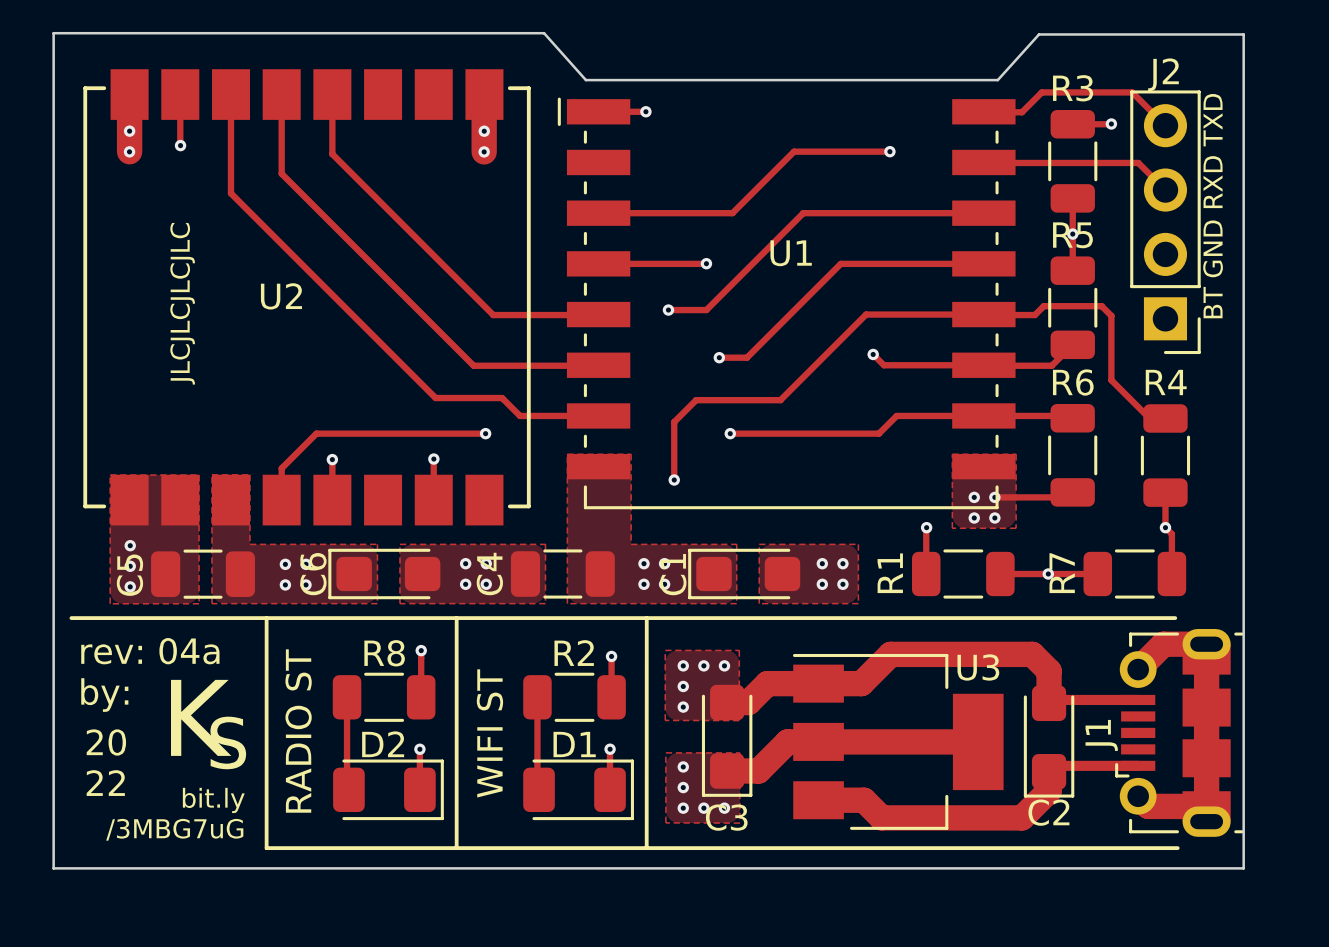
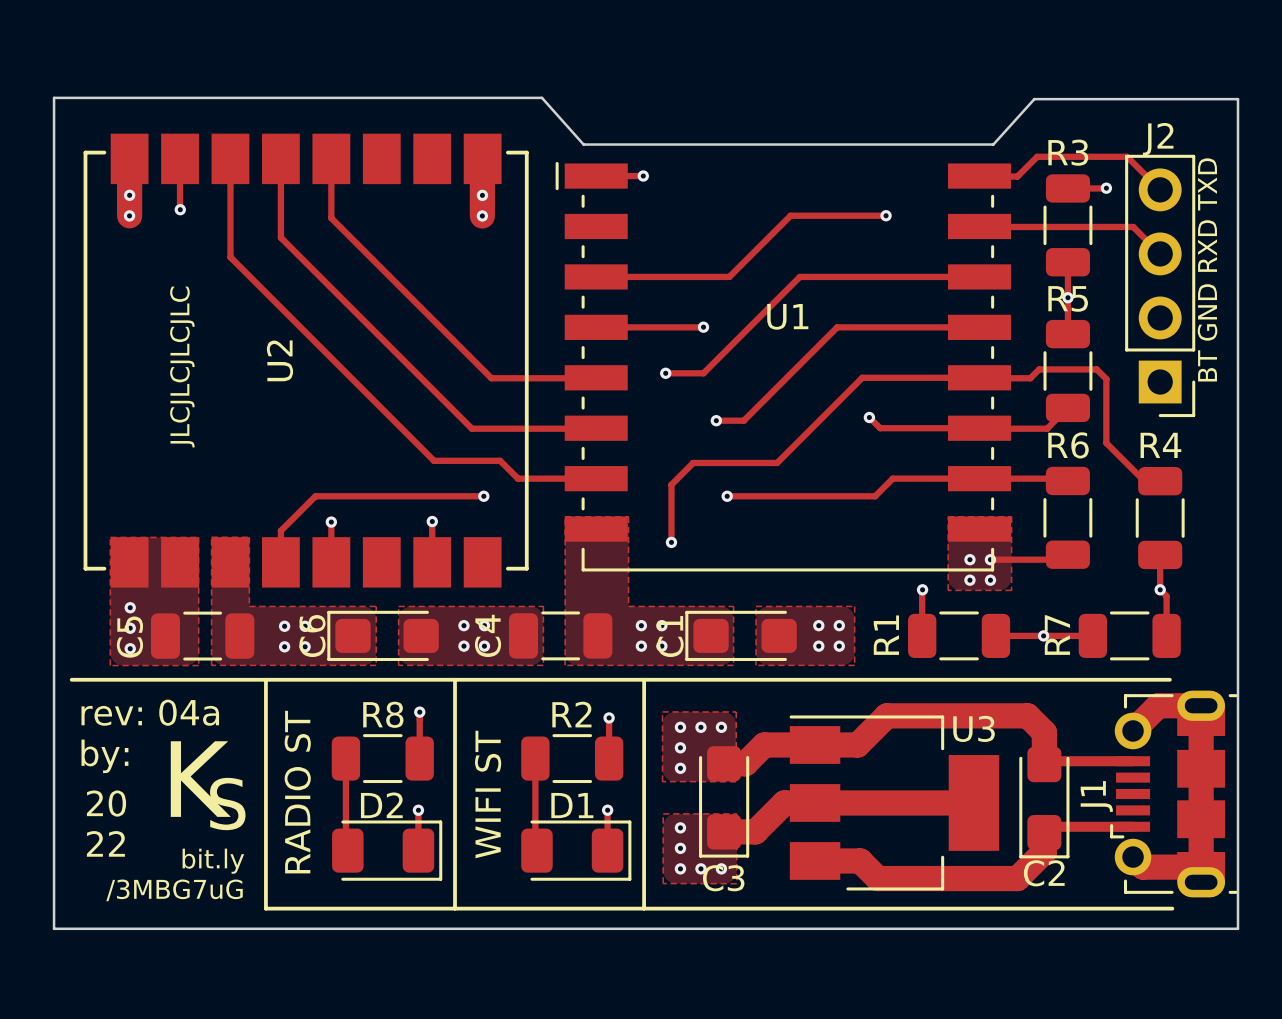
U2 name rotation: 0° (281, 296) -> 90° counterclockwise (279, 360)

